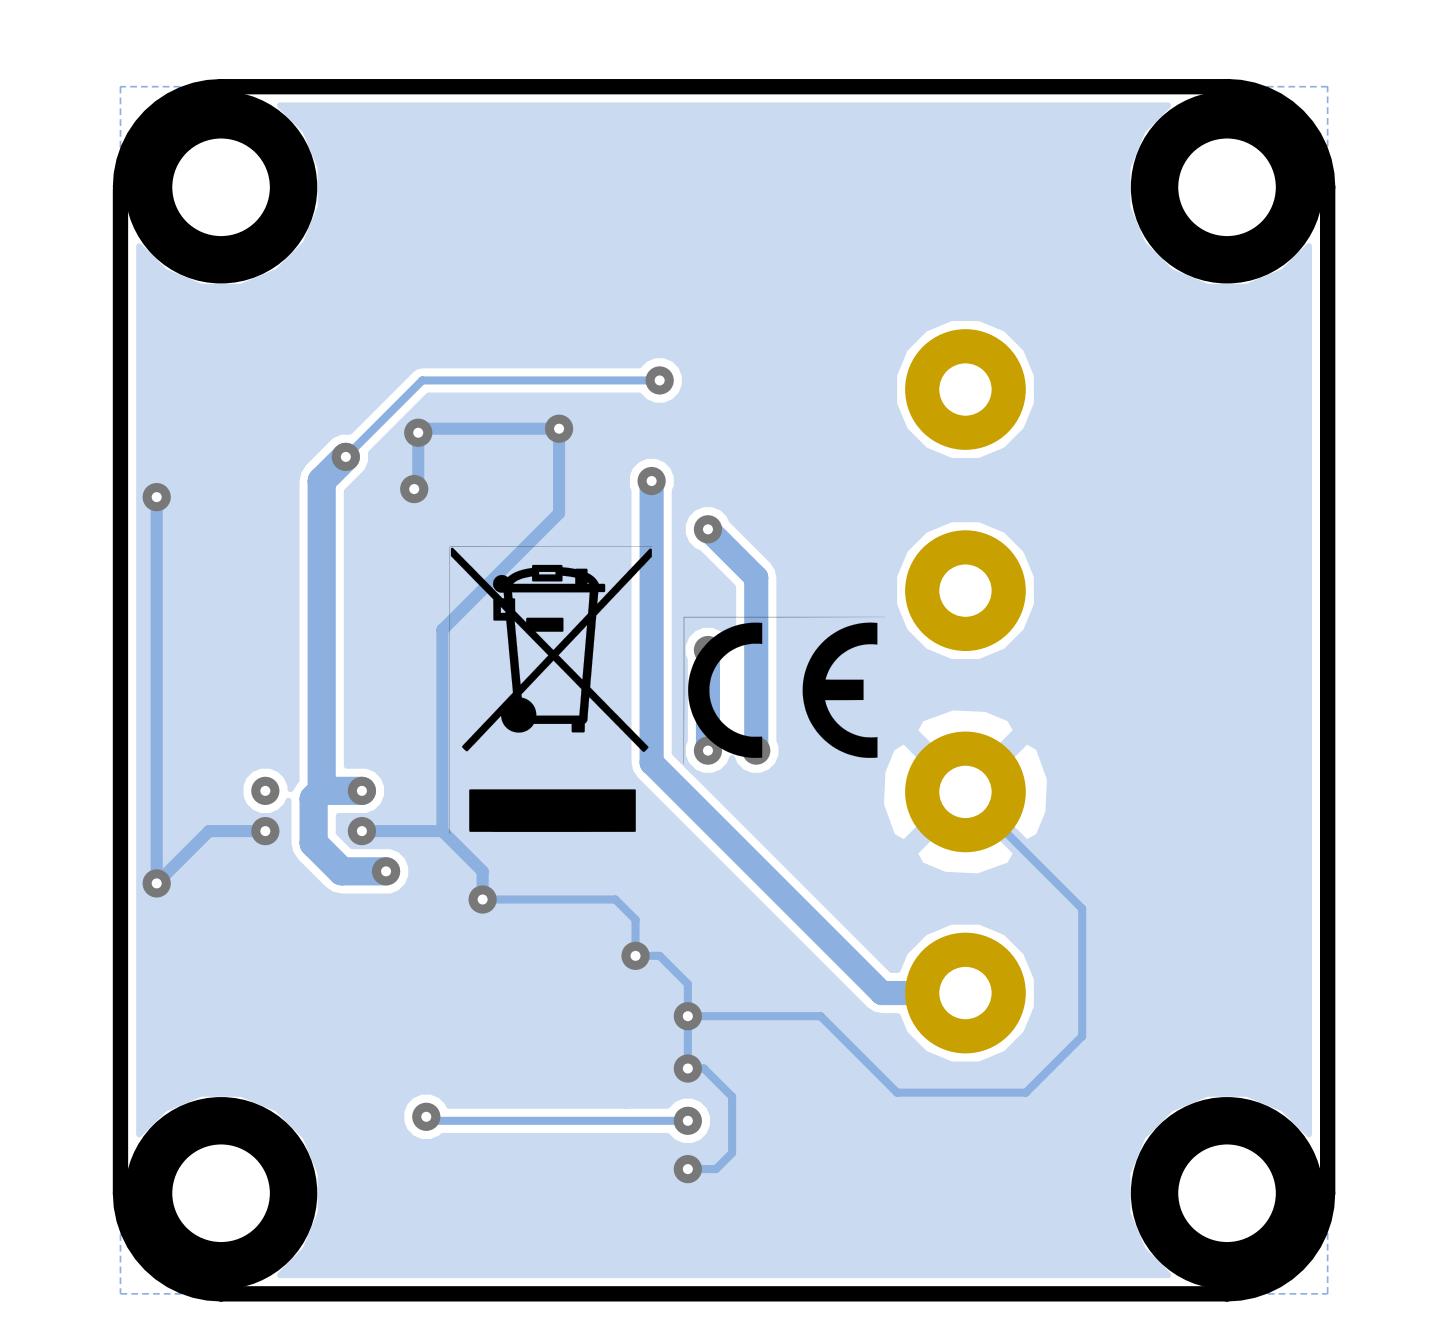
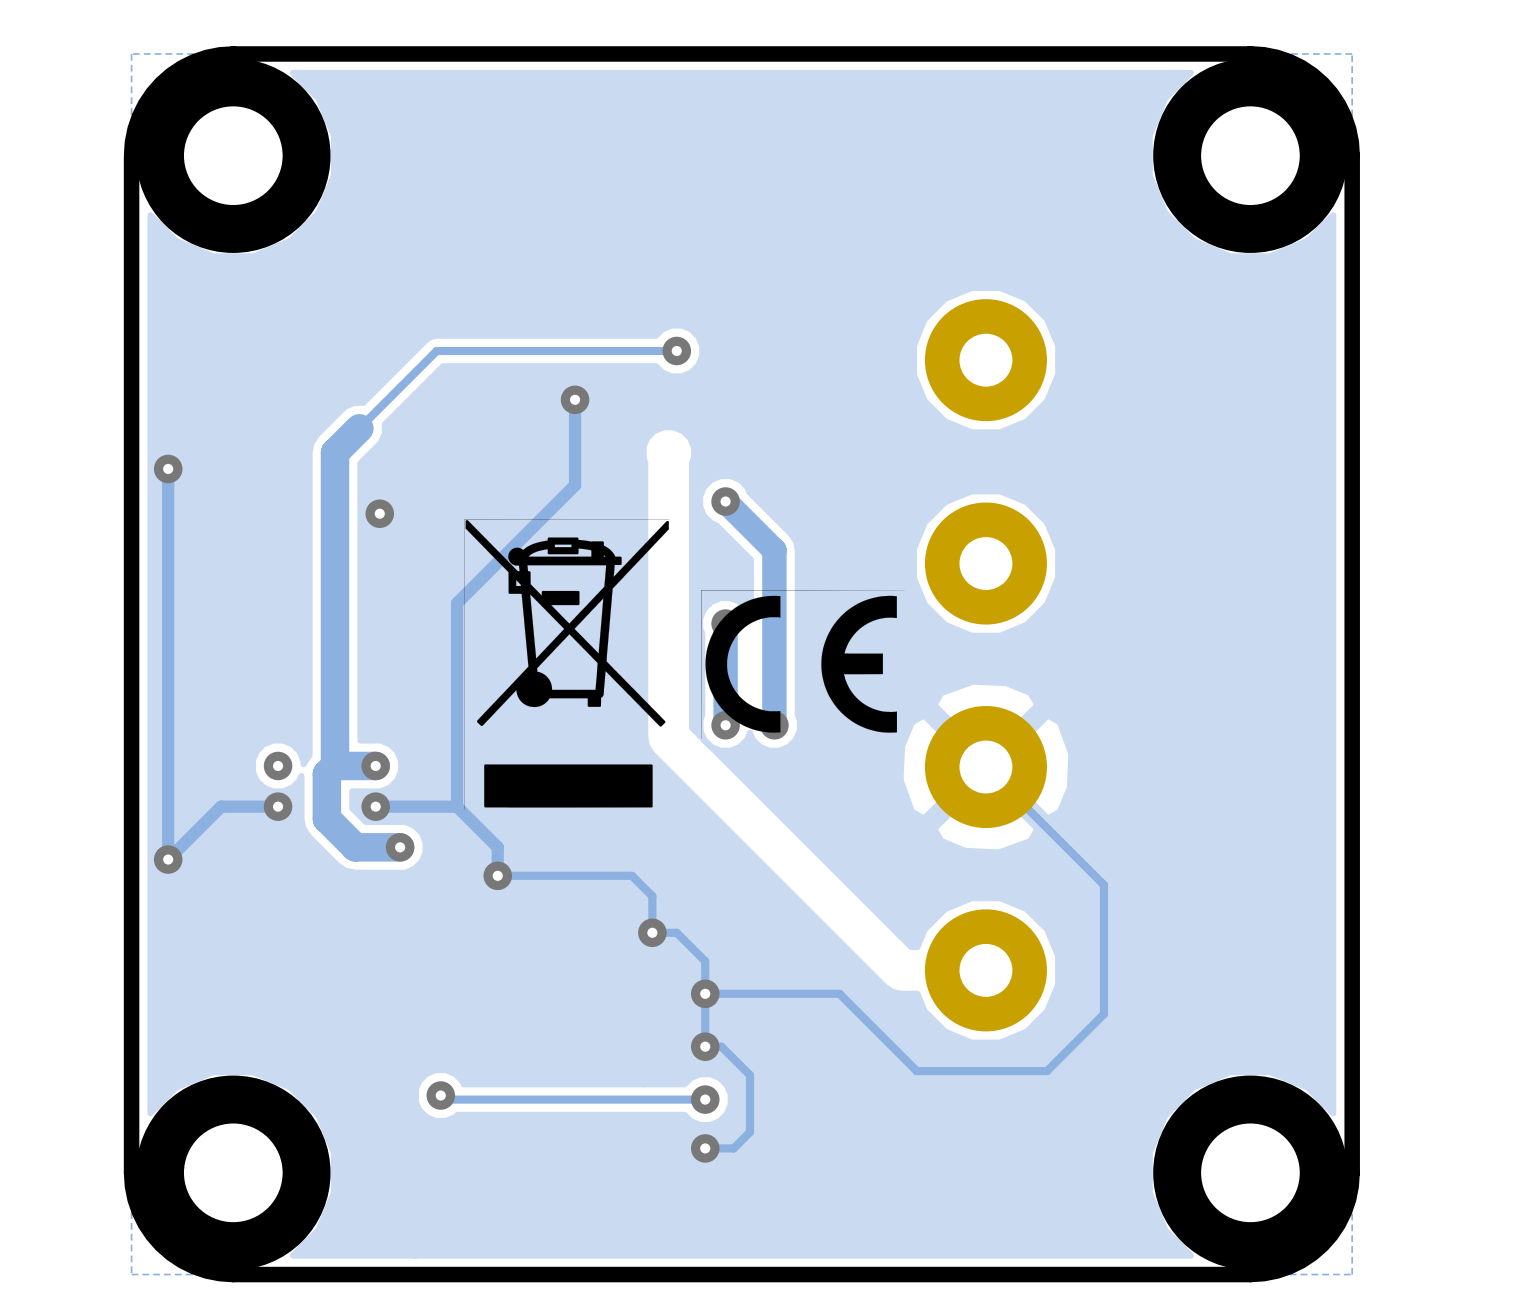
track: (559, 428) (422, 428) (418, 432) (418, 485) (414, 489) -> none
via: (418, 432) -> none
via: (345, 456) -> none
track: (651, 481) (651, 762) (881, 993) (965, 993) -> none
via: (651, 481) -> none
via: (414, 489) -> none
via: none -> (379, 513)

